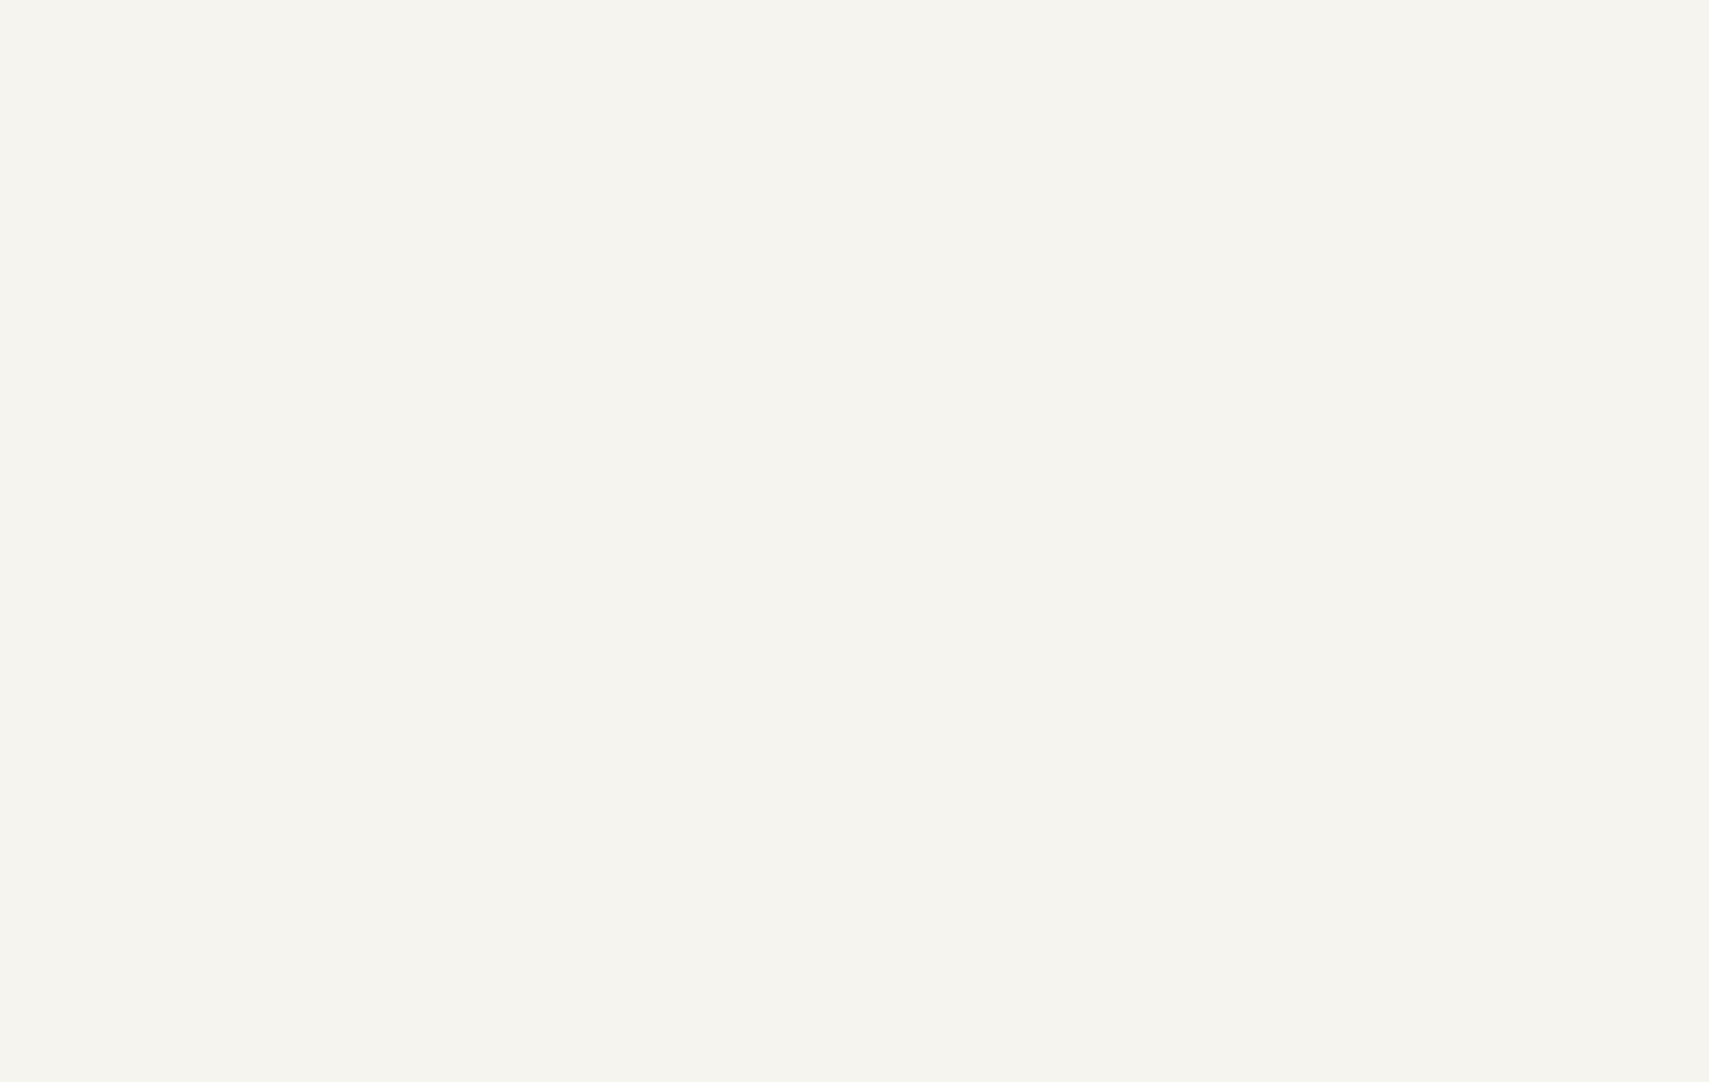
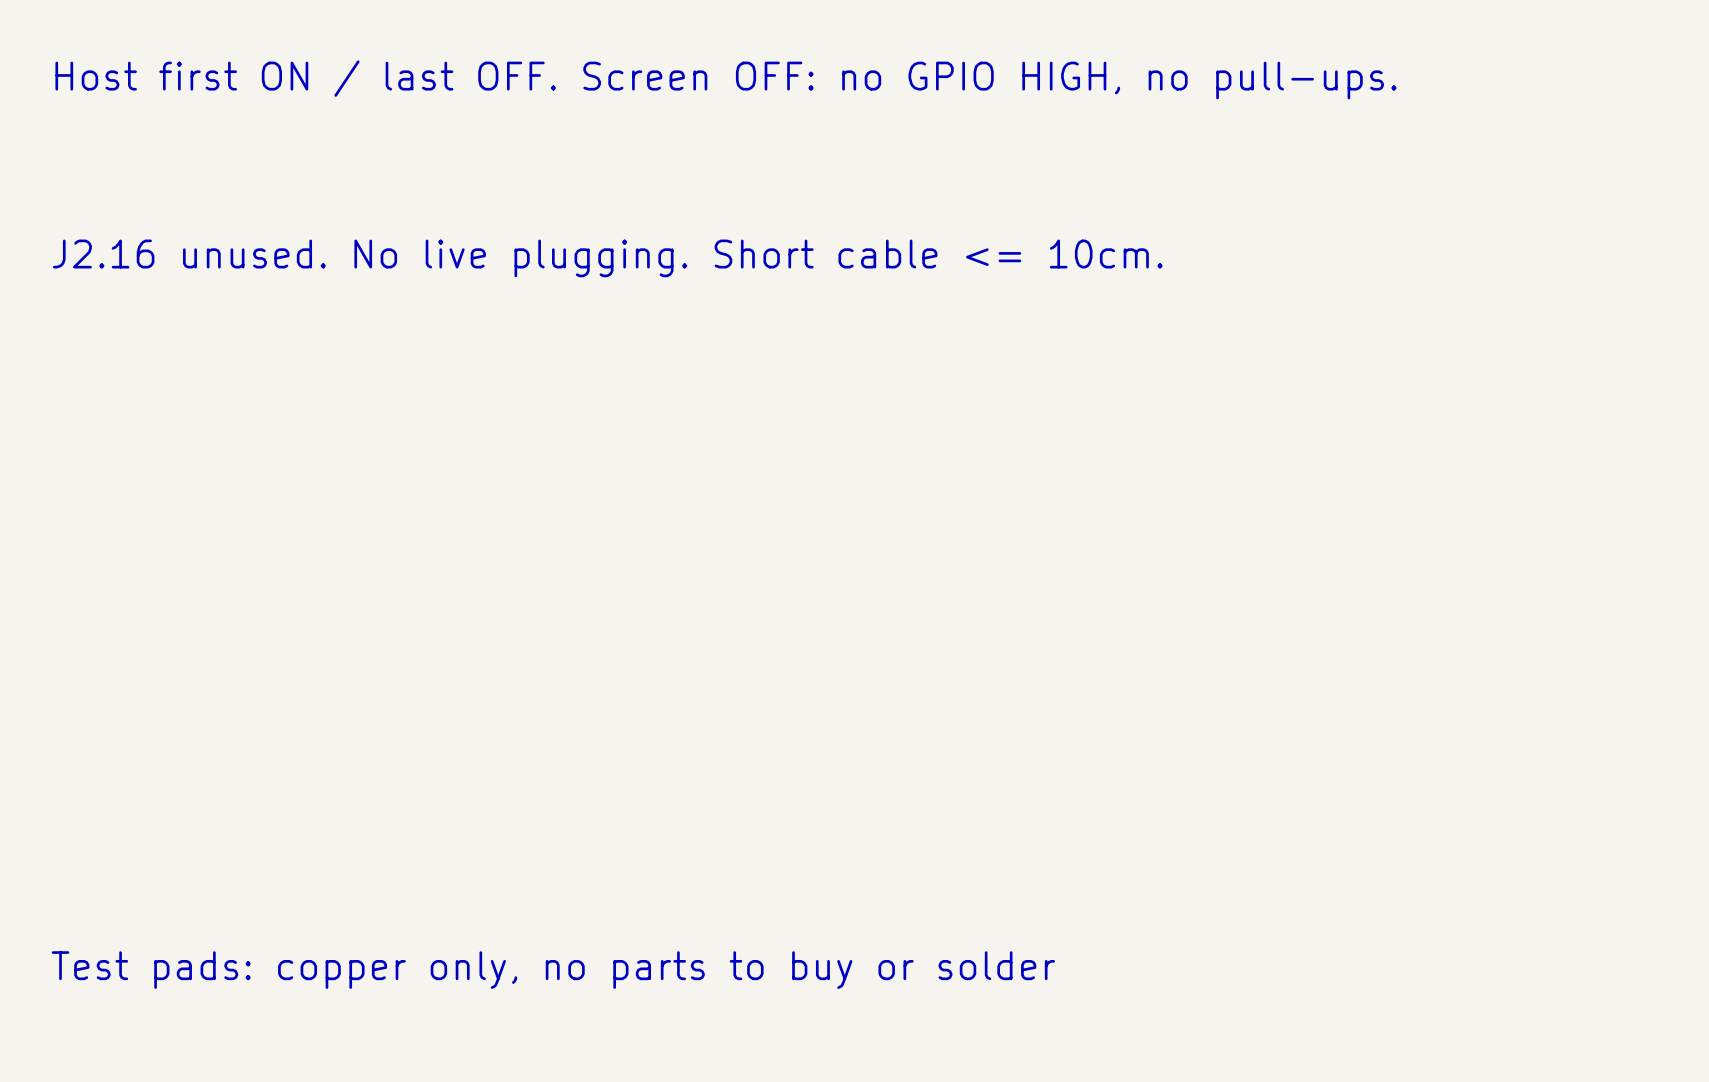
text: none -> Host first ON / last OFF. Screen OFF: no GPIO HIGH, no pull-ups. (725, 79)
text: none -> J2.16 unused. No live plugging. Short cable <= 10cm. (607, 258)
text: none -> Test pads: copper only, no parts to buy or solder (553, 970)

